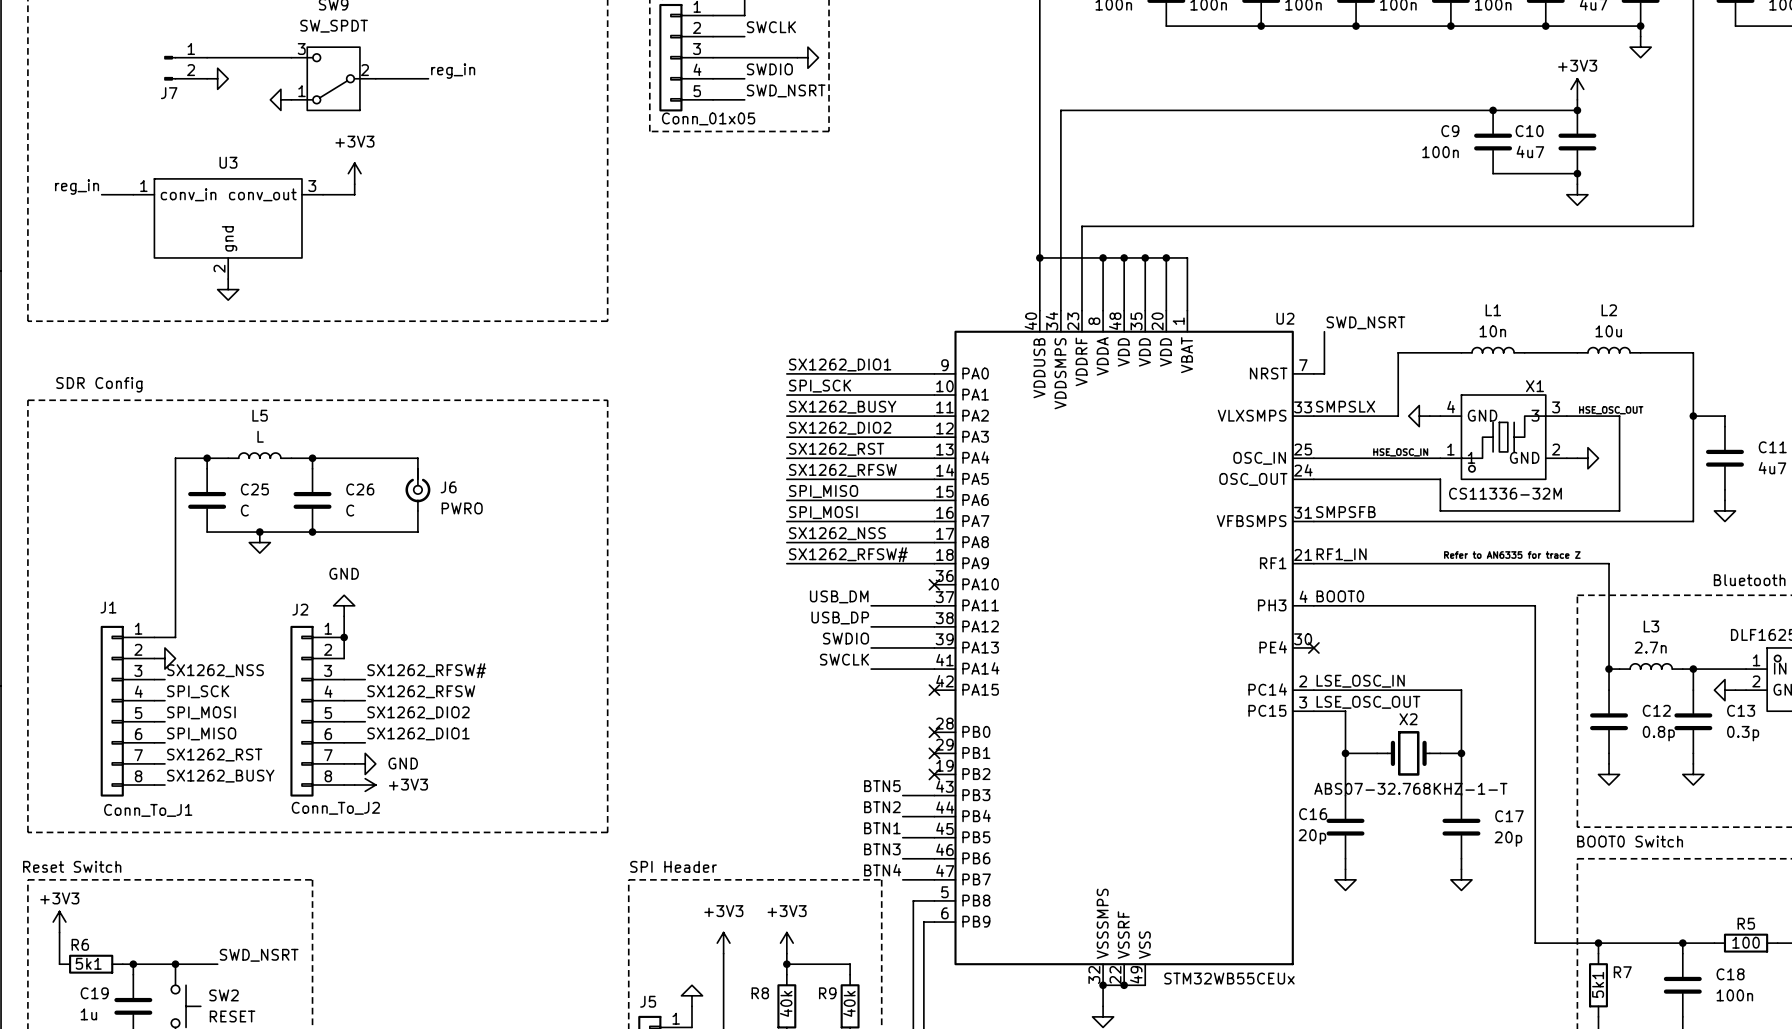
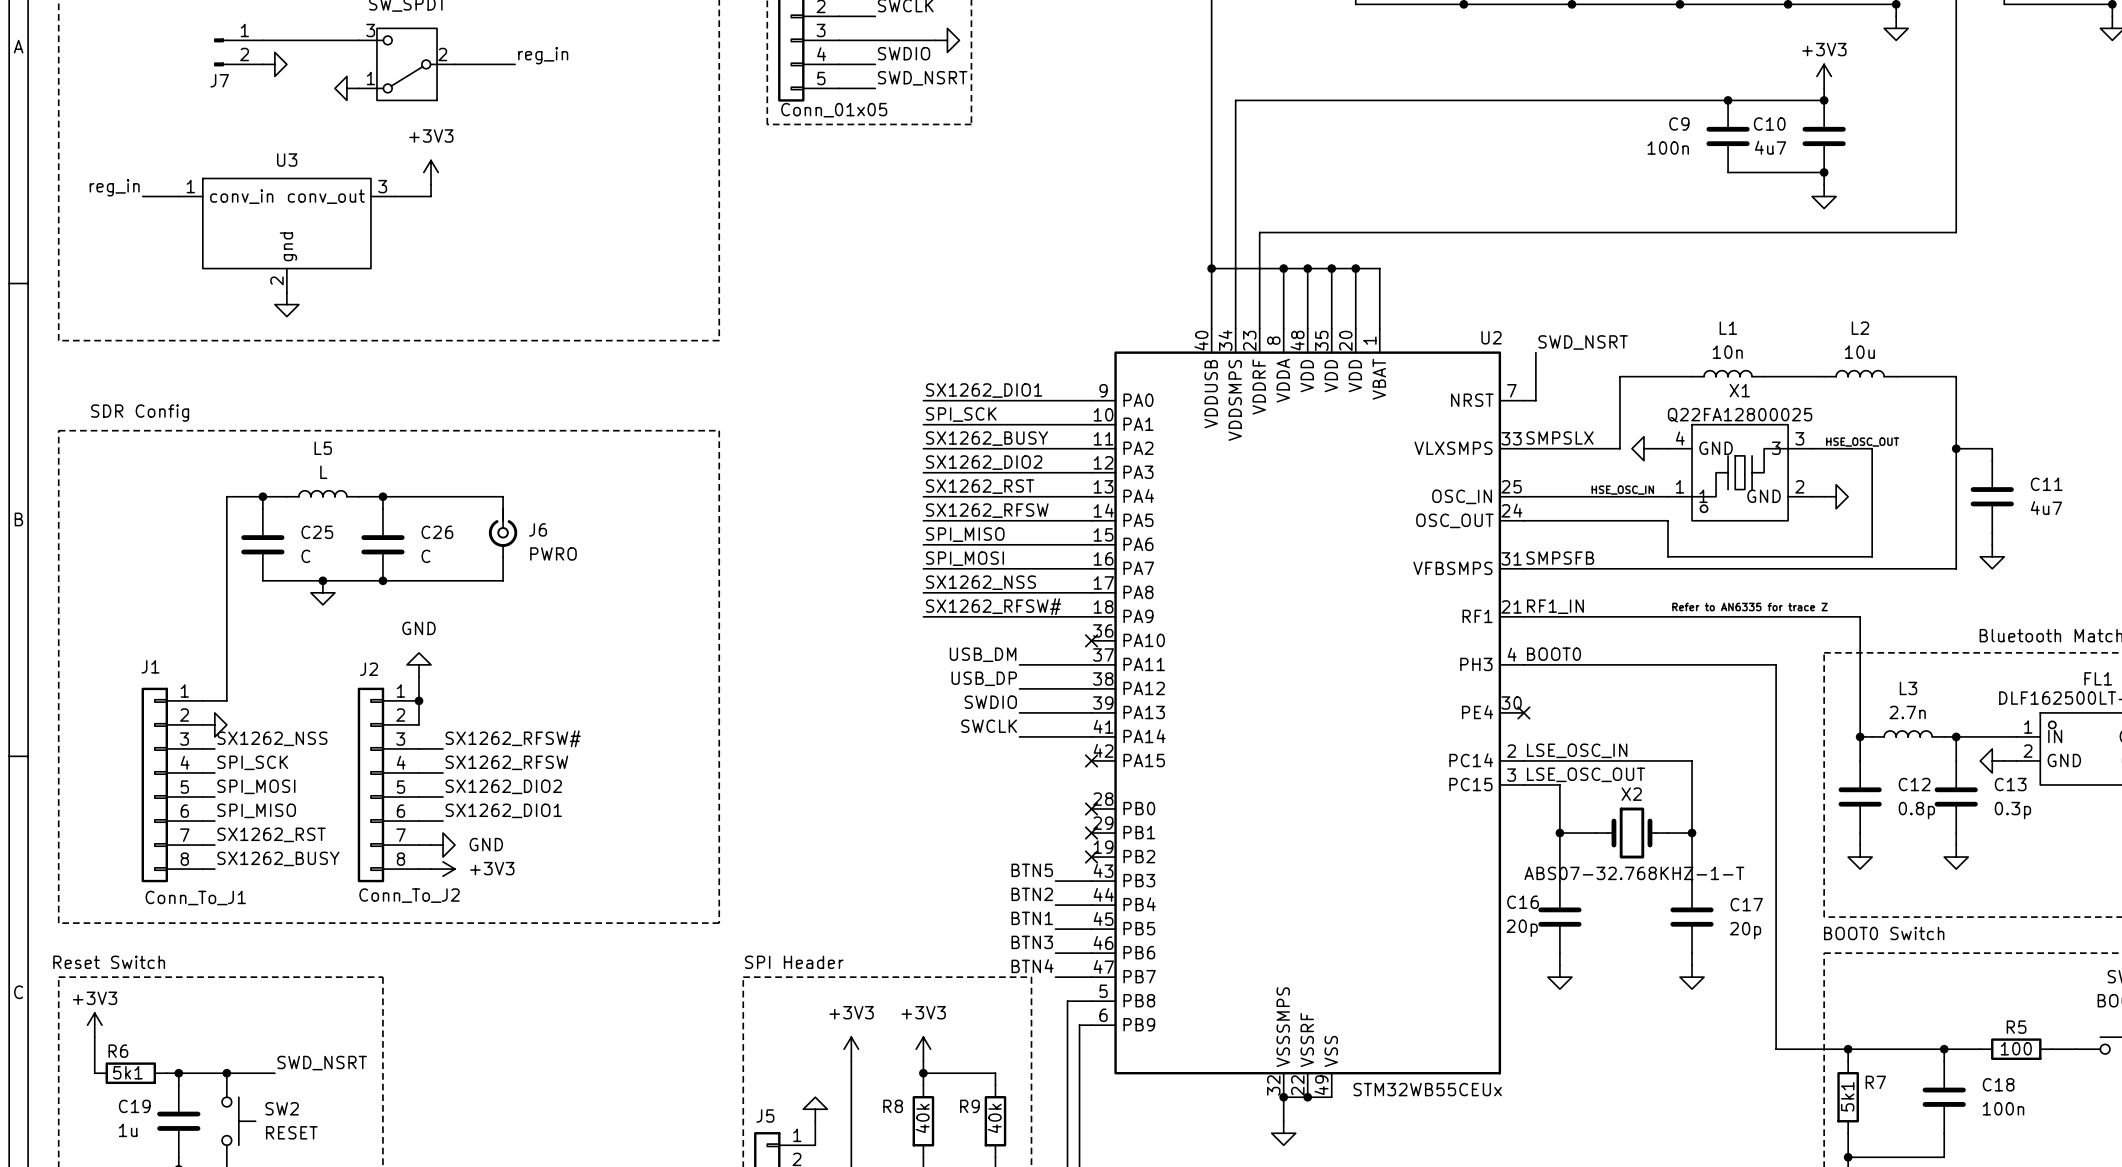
X1 name position: X1 (1534, 386) -> X1 (1739, 390)
X1 value: CS11336-32M (1505, 493) -> Q22FA12800025 (1740, 415)

